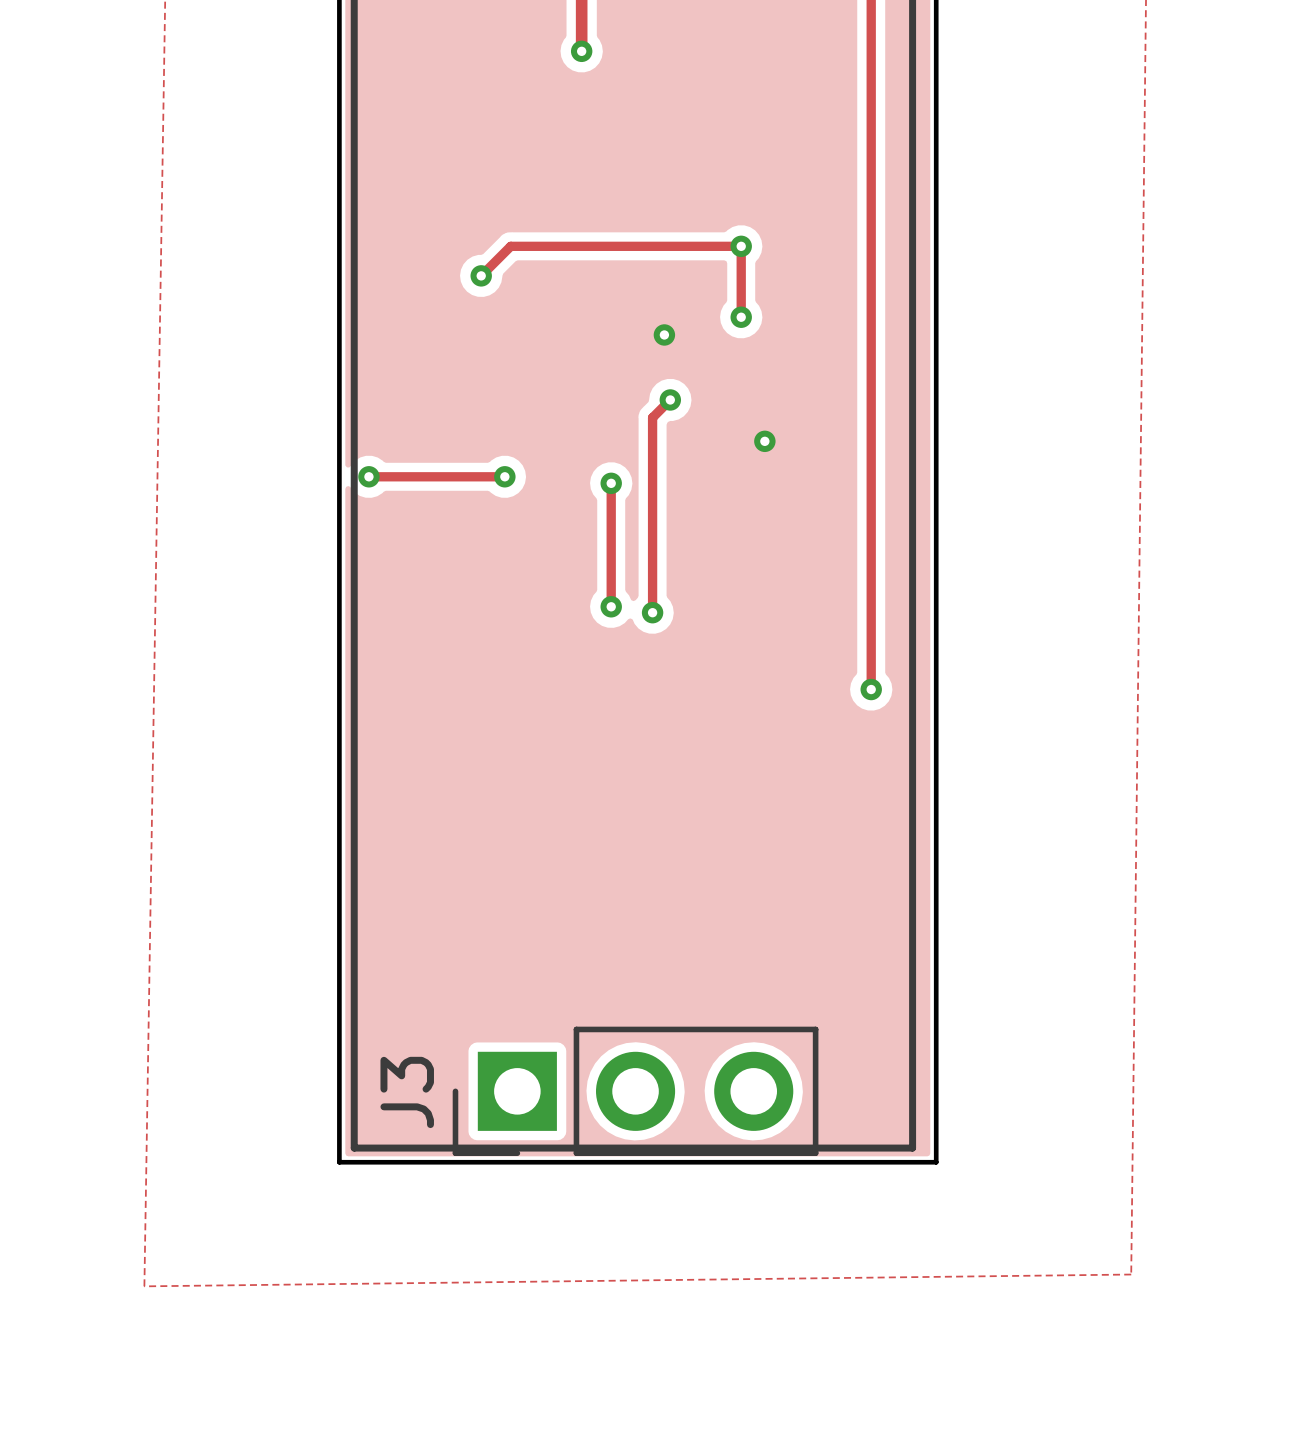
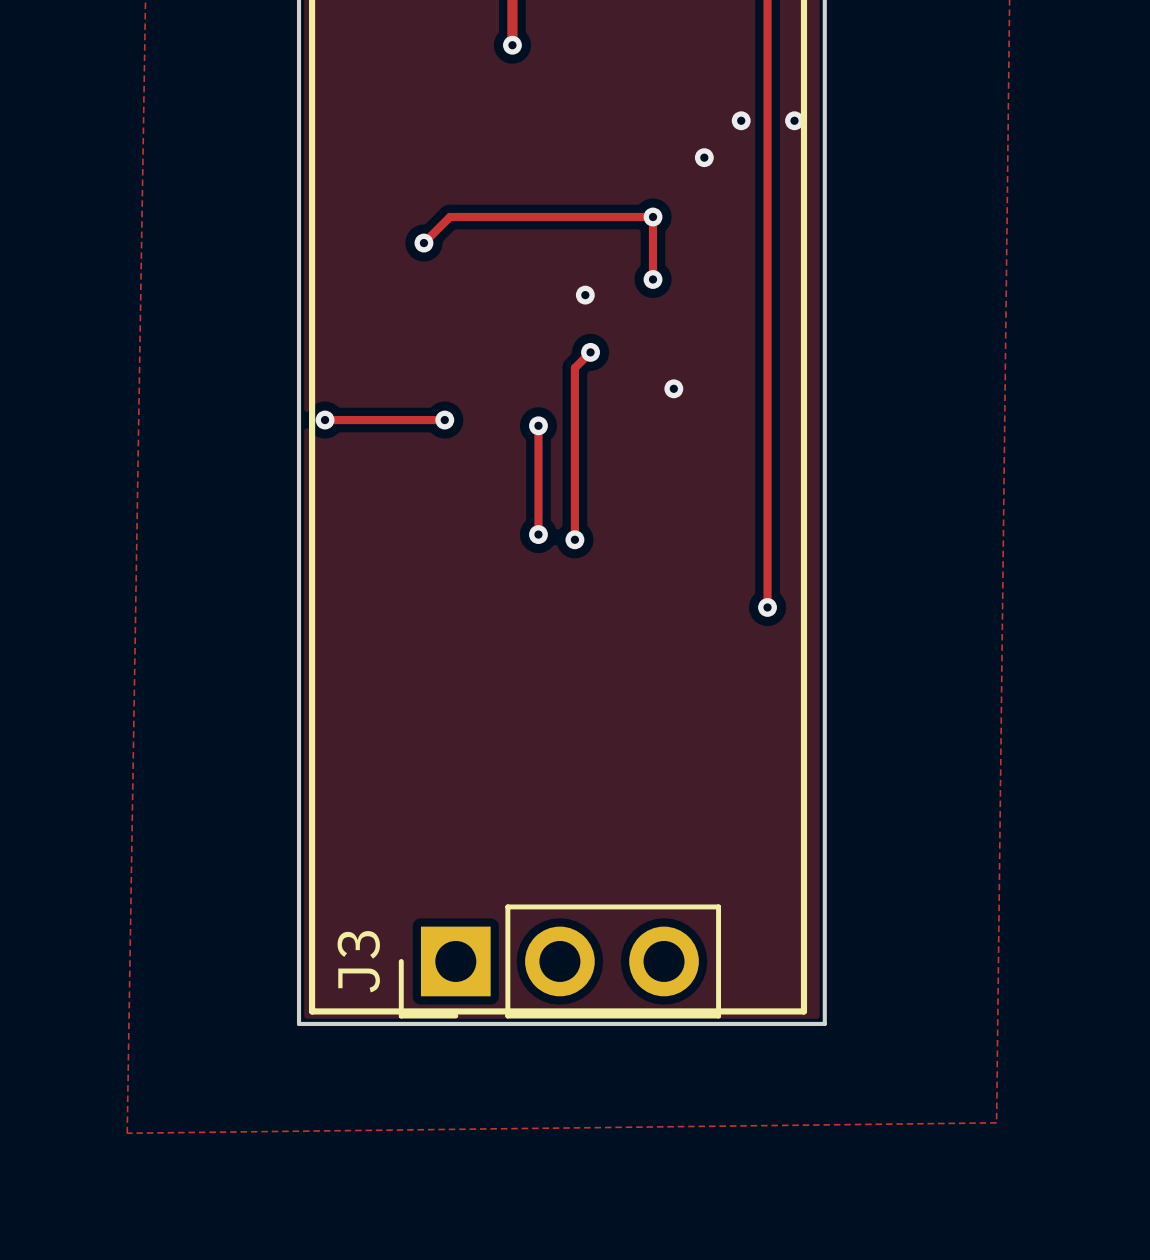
via: none -> (741, 120)
via: none -> (794, 120)
via: none -> (704, 157)

